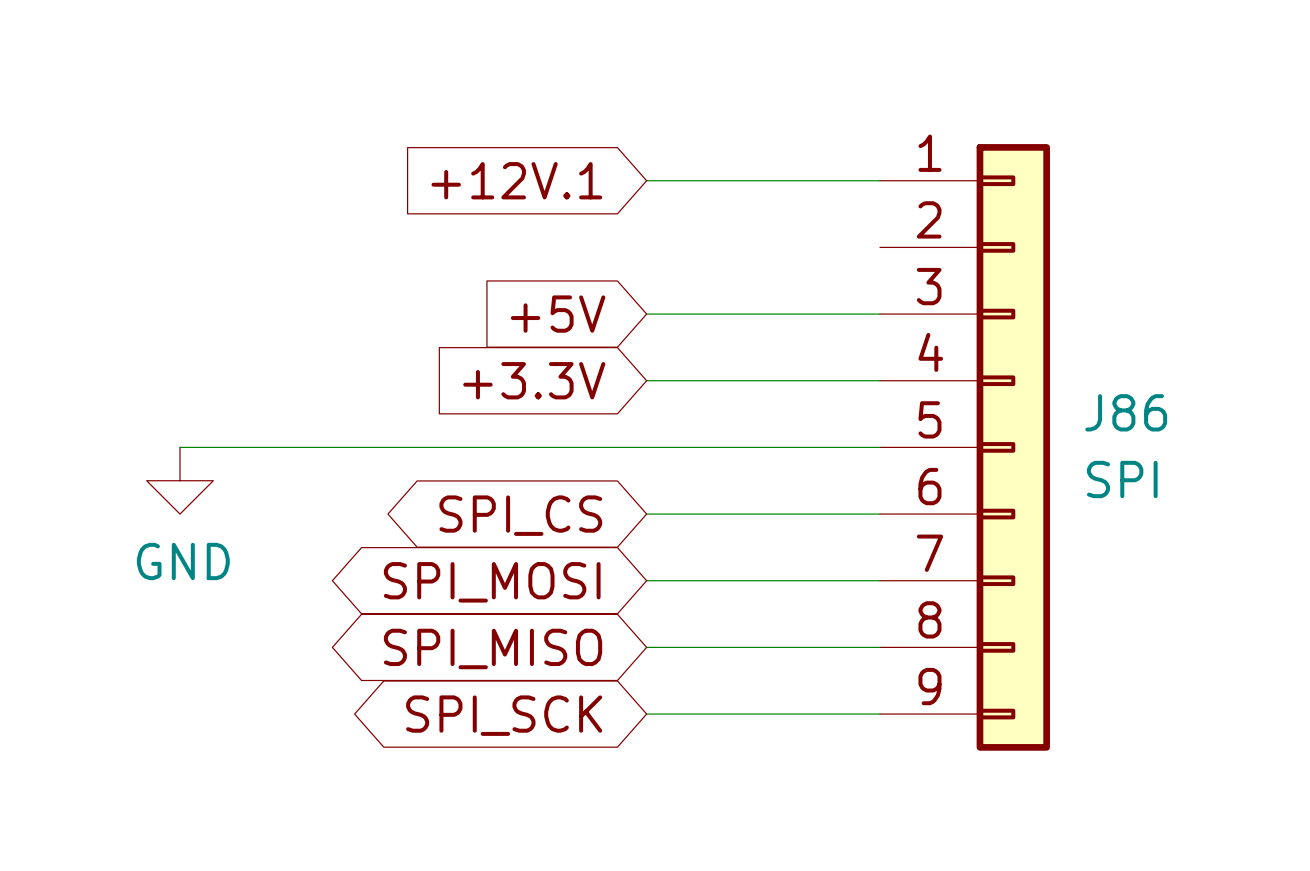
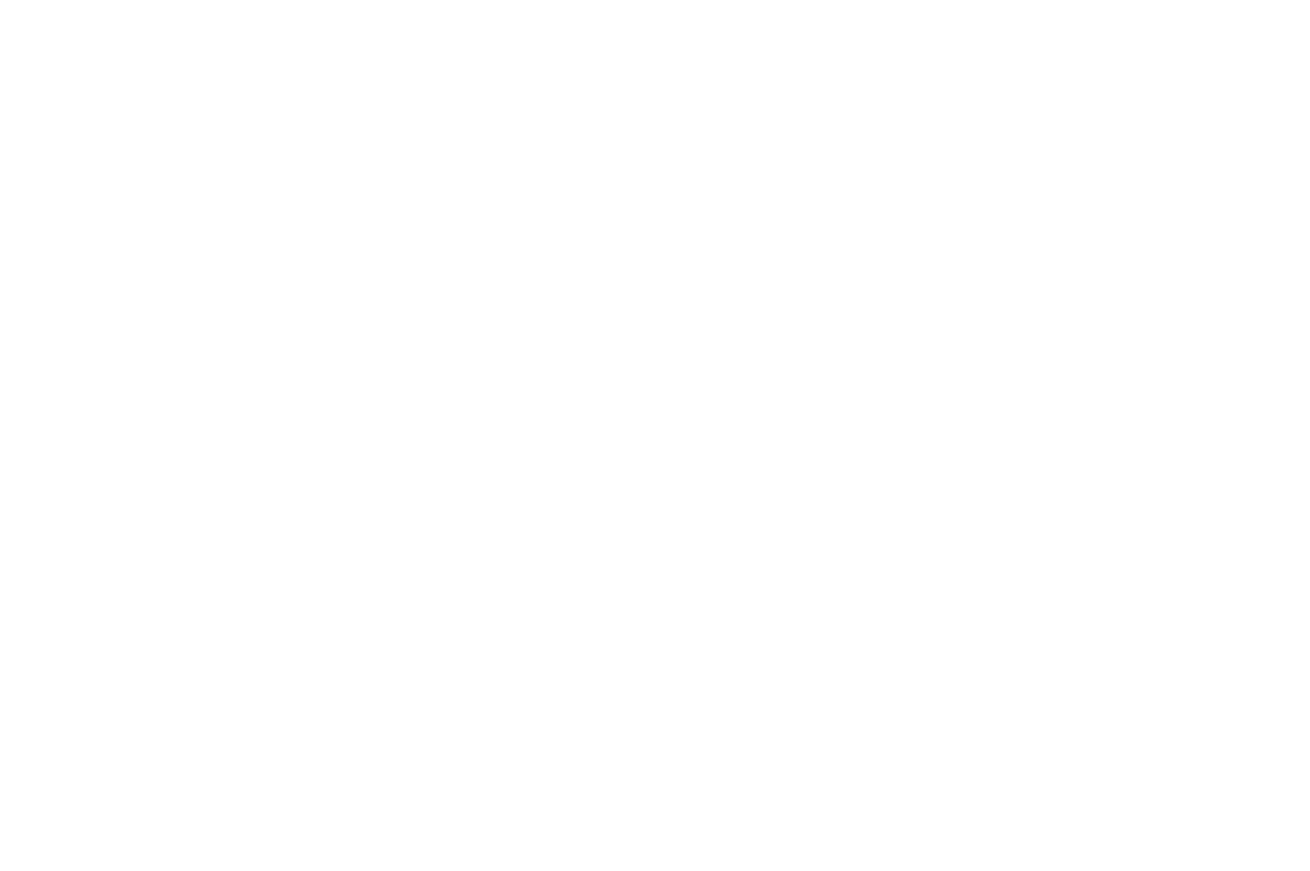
global label: +12V.1 (516, 180) -> none
wire: (646, 180) (879, 180) -> none
global label: +5V (558, 314) -> none
wire: (646, 314) (879, 314) -> none
global label: +3.3V (534, 380) -> none
wire: (646, 380) (879, 380) -> none
wire: (179, 447) (879, 447) -> none
J86: SPI (964, 447) -> none
power symbol: GND (179, 480) -> none
wire: (646, 514) (879, 514) -> none
global label: SPI_CS (520, 515) -> none
wire: (646, 580) (879, 580) -> none
global label: SPI_MOSI (492, 582) -> none
wire: (646, 647) (879, 647) -> none
global label: SPI_MISO (493, 648) -> none
wire: (646, 714) (879, 714) -> none
global label: SPI_SCK (504, 715) -> none

